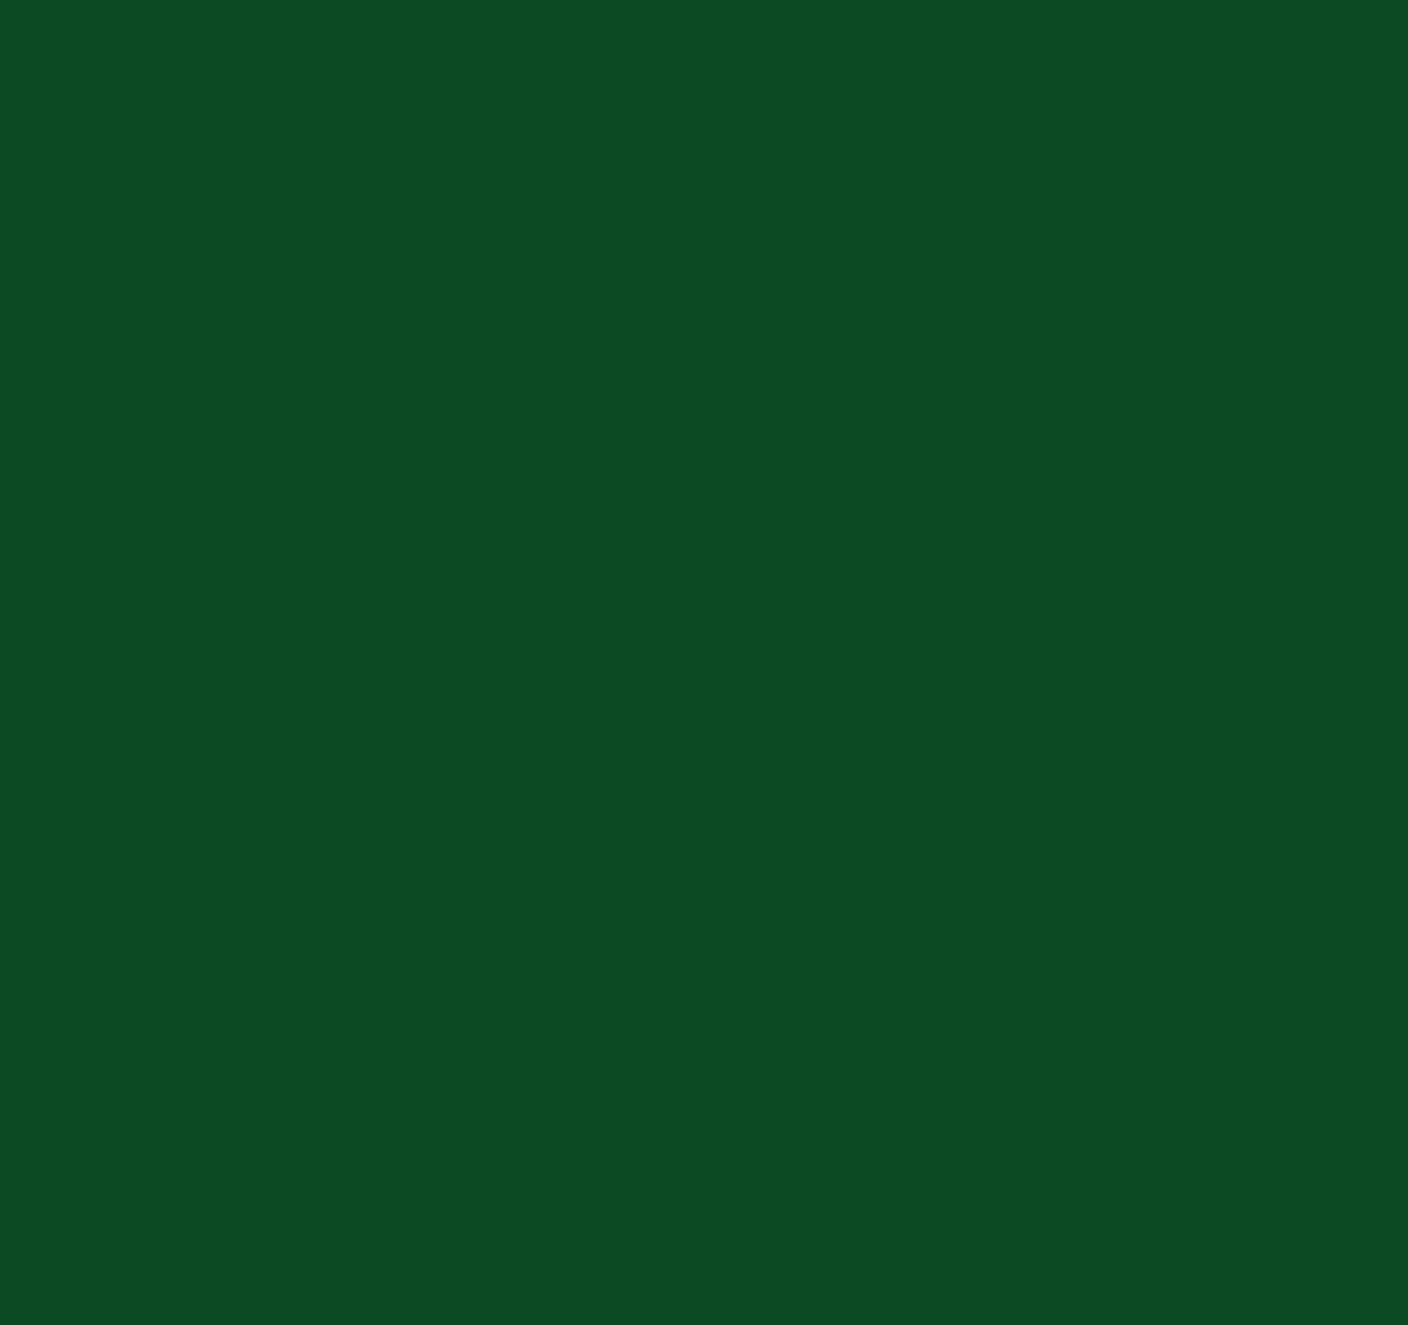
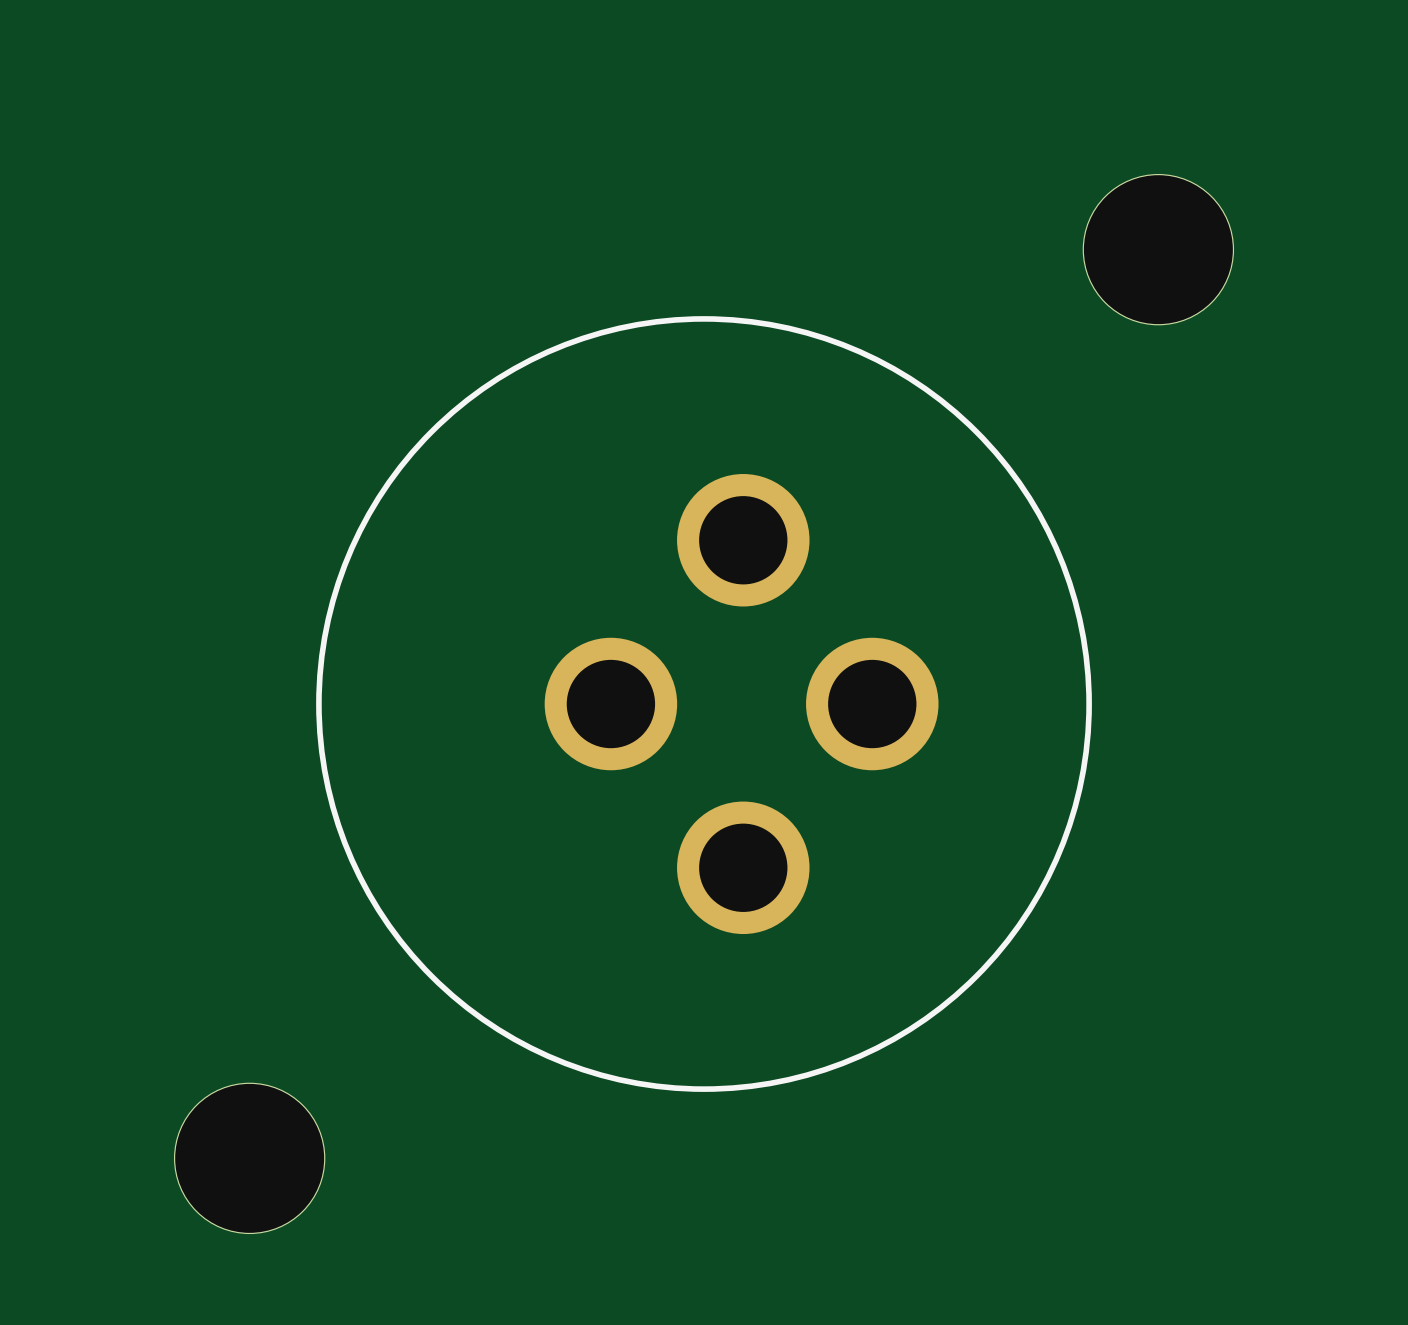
part: none -> (704, 704)

